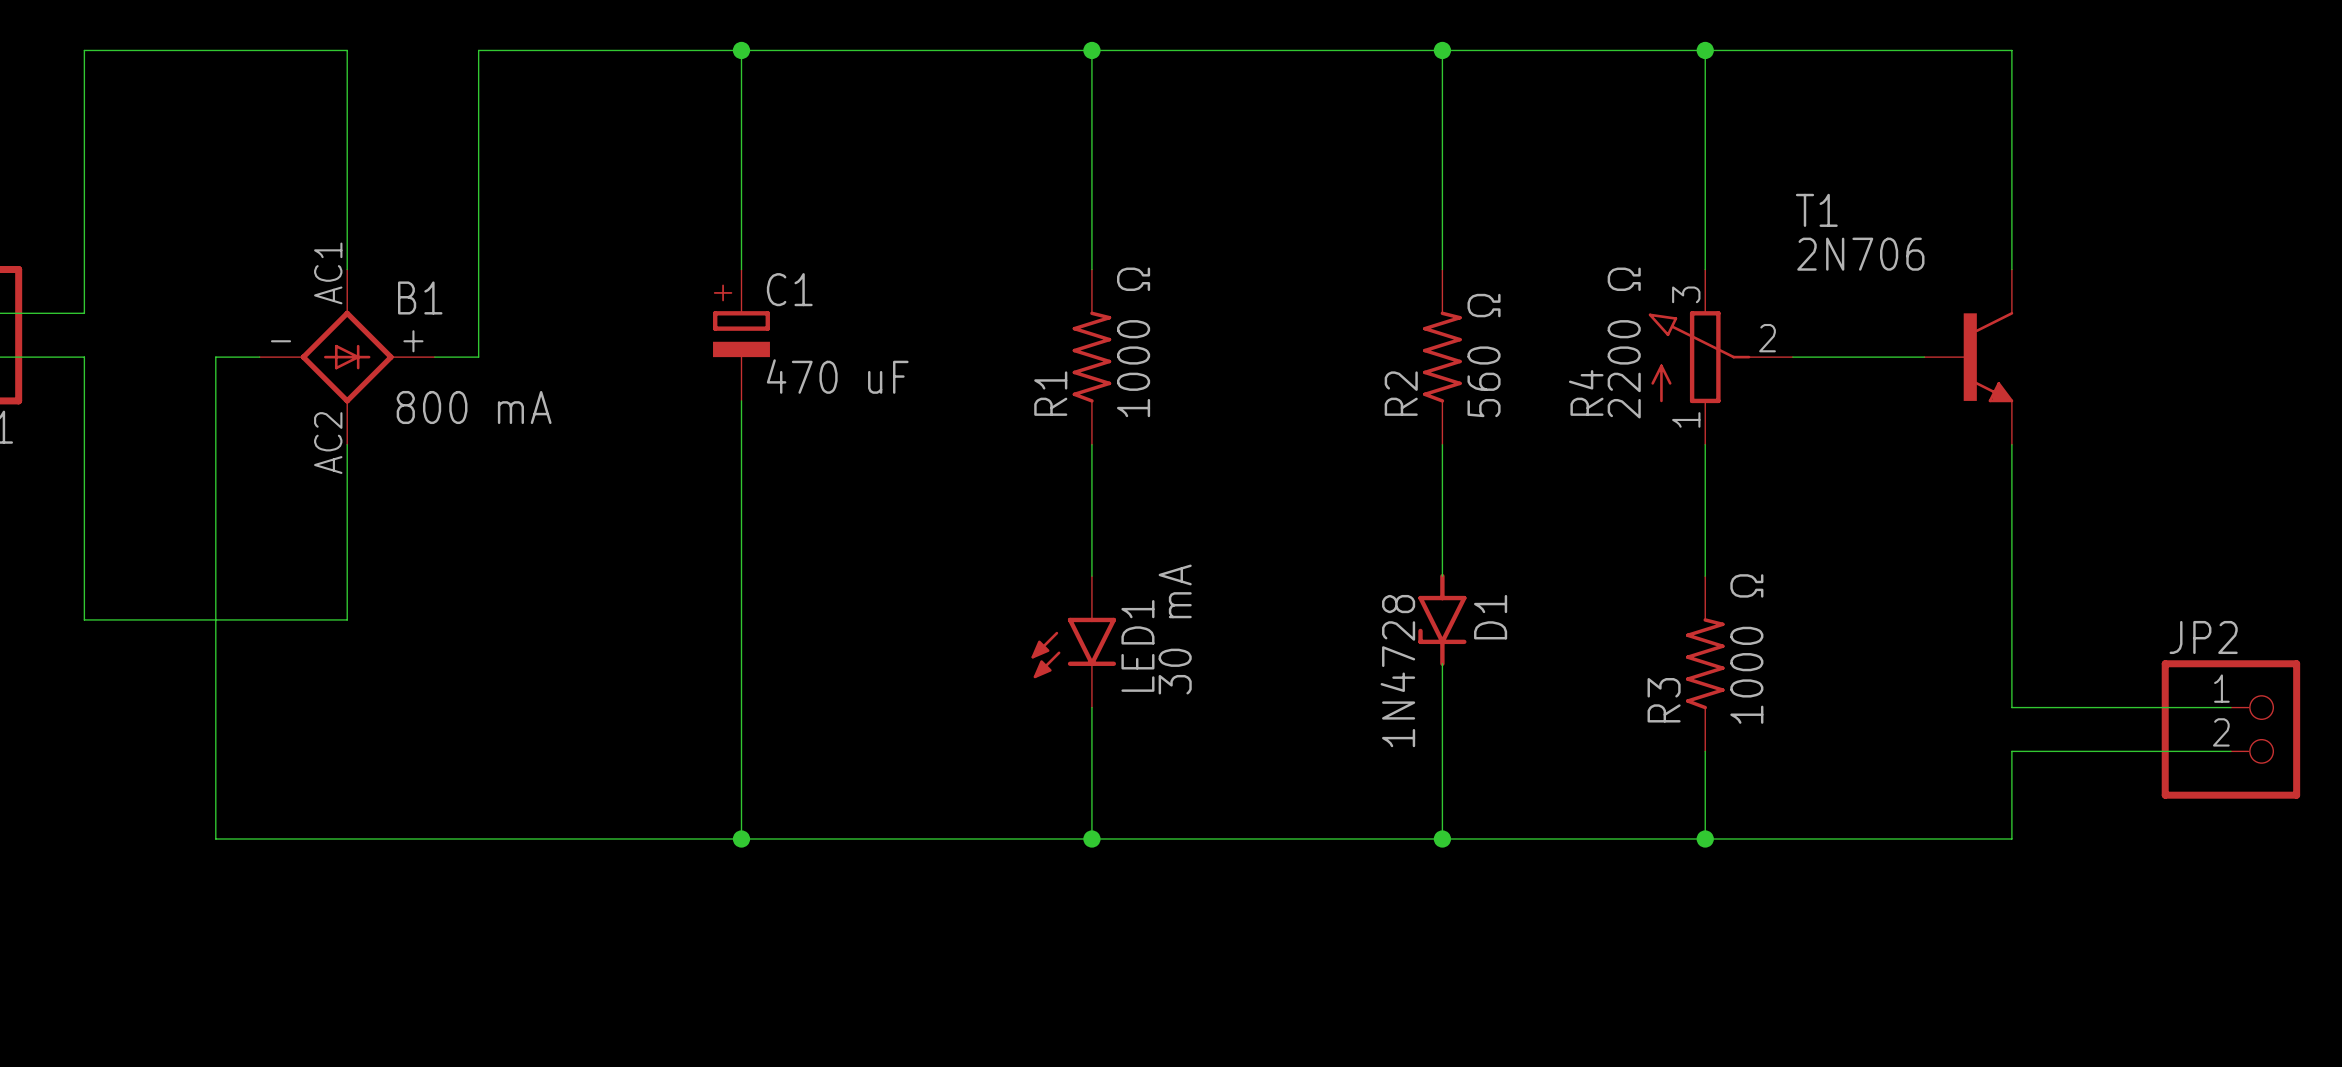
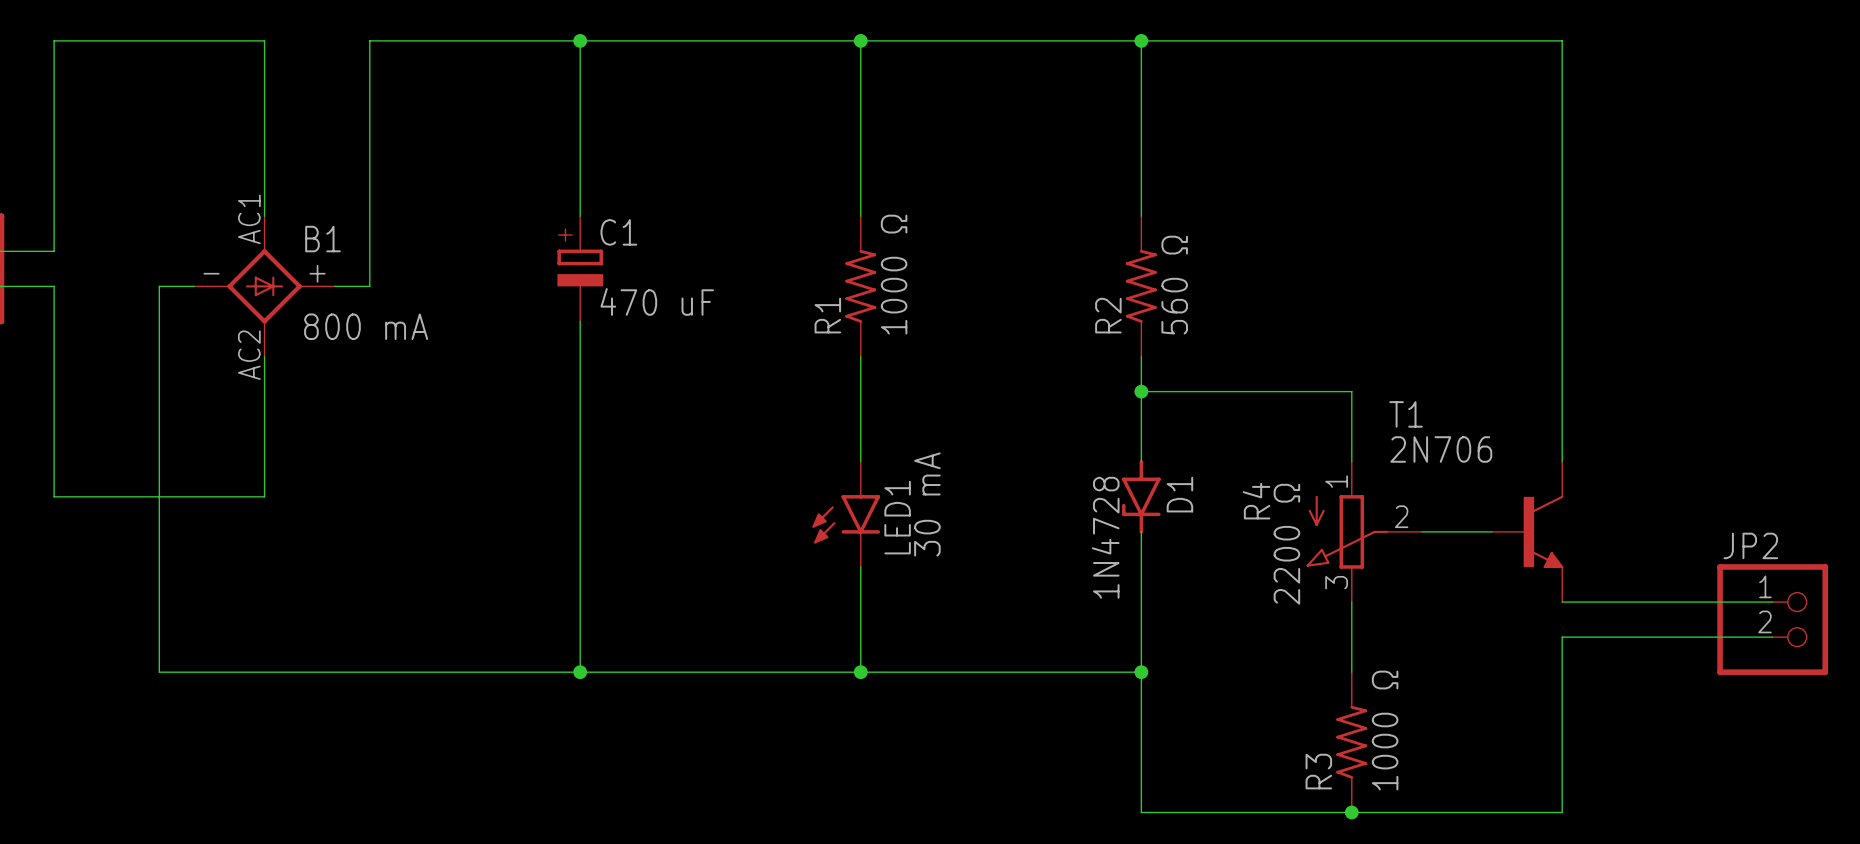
wire: (1705, 50) (1705, 269) -> none
junction: (1705, 50) -> none
wire: (1968, 50) (2011, 50) (2011, 269) -> (1562, 40) (1562, 461)
R4 flip: as is (1699, 357) -> up-down (1347, 531)
R4 position: (1720, 357) -> (1364, 531)
wire: (1792, 357) (1924, 357) -> none
T1 position: (1968, 357) -> (1527, 531)
wire: (1705, 444) (1705, 488) -> (1141, 391) (1351, 391)
wire: (2011, 444) (2011, 707) (2230, 707) -> none
junction: none -> (1141, 391)
R3 position: (1705, 663) -> (1351, 742)
wire: none -> (1421, 531) (1492, 531)
JP2 position: (2230, 729) -> (1772, 619)
wire: none -> (1562, 602) (1597, 602)
wire: (2011, 751) (2011, 838) (1442, 838) -> (1772, 637) (1562, 637) (1562, 812) (1141, 812) (1141, 672)
junction: (1705, 838) -> none
junction: none -> (1351, 812)

